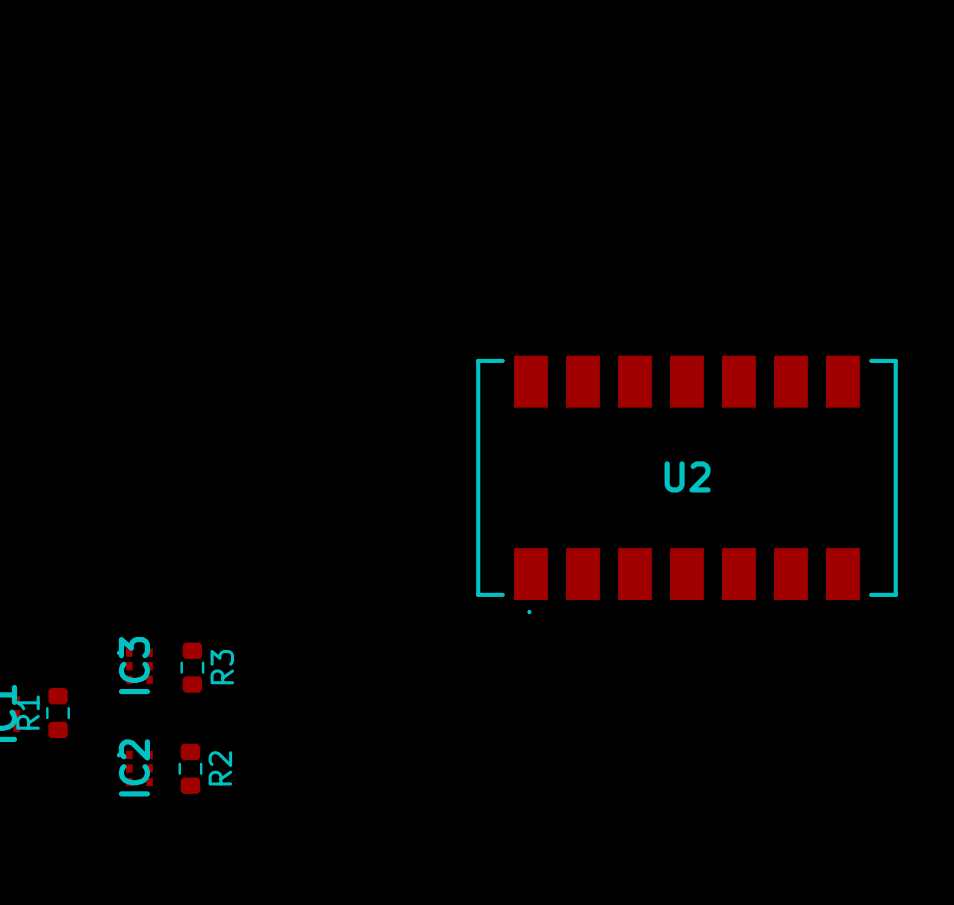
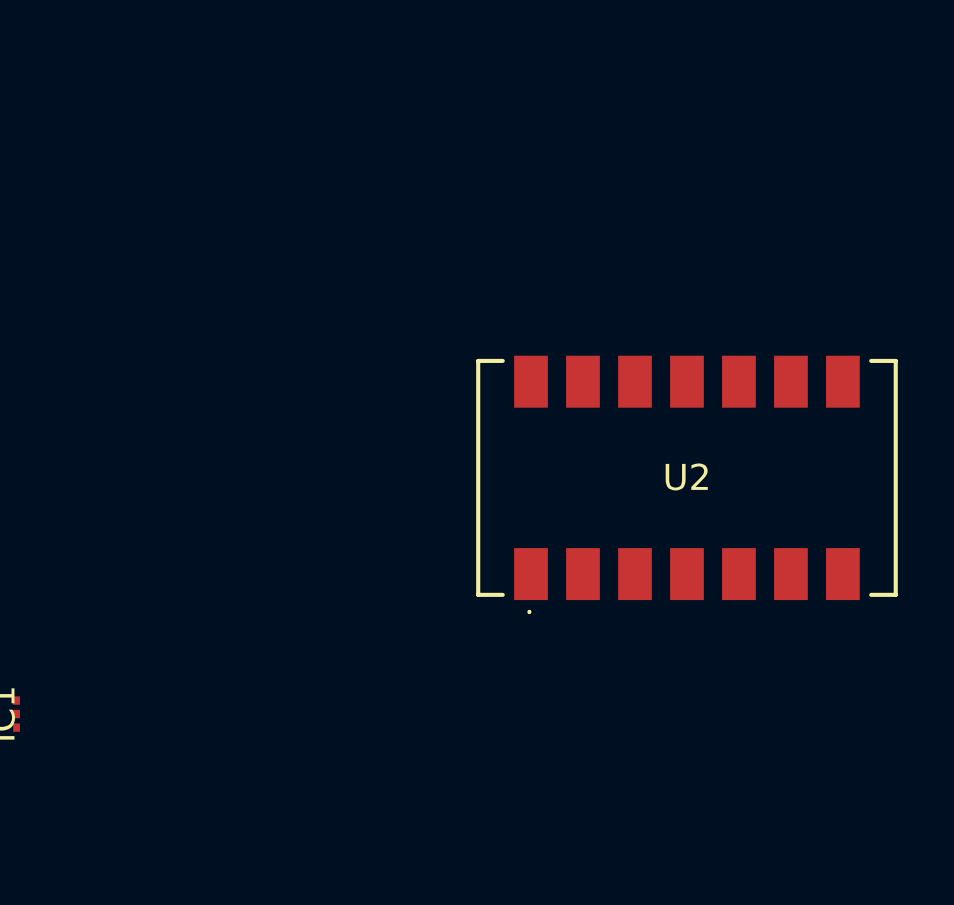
IC3: (134, 666) -> none
R3: (192, 667) -> none
R1: (58, 713) -> none
IC2: (134, 768) -> none
R2: (190, 768) -> none

